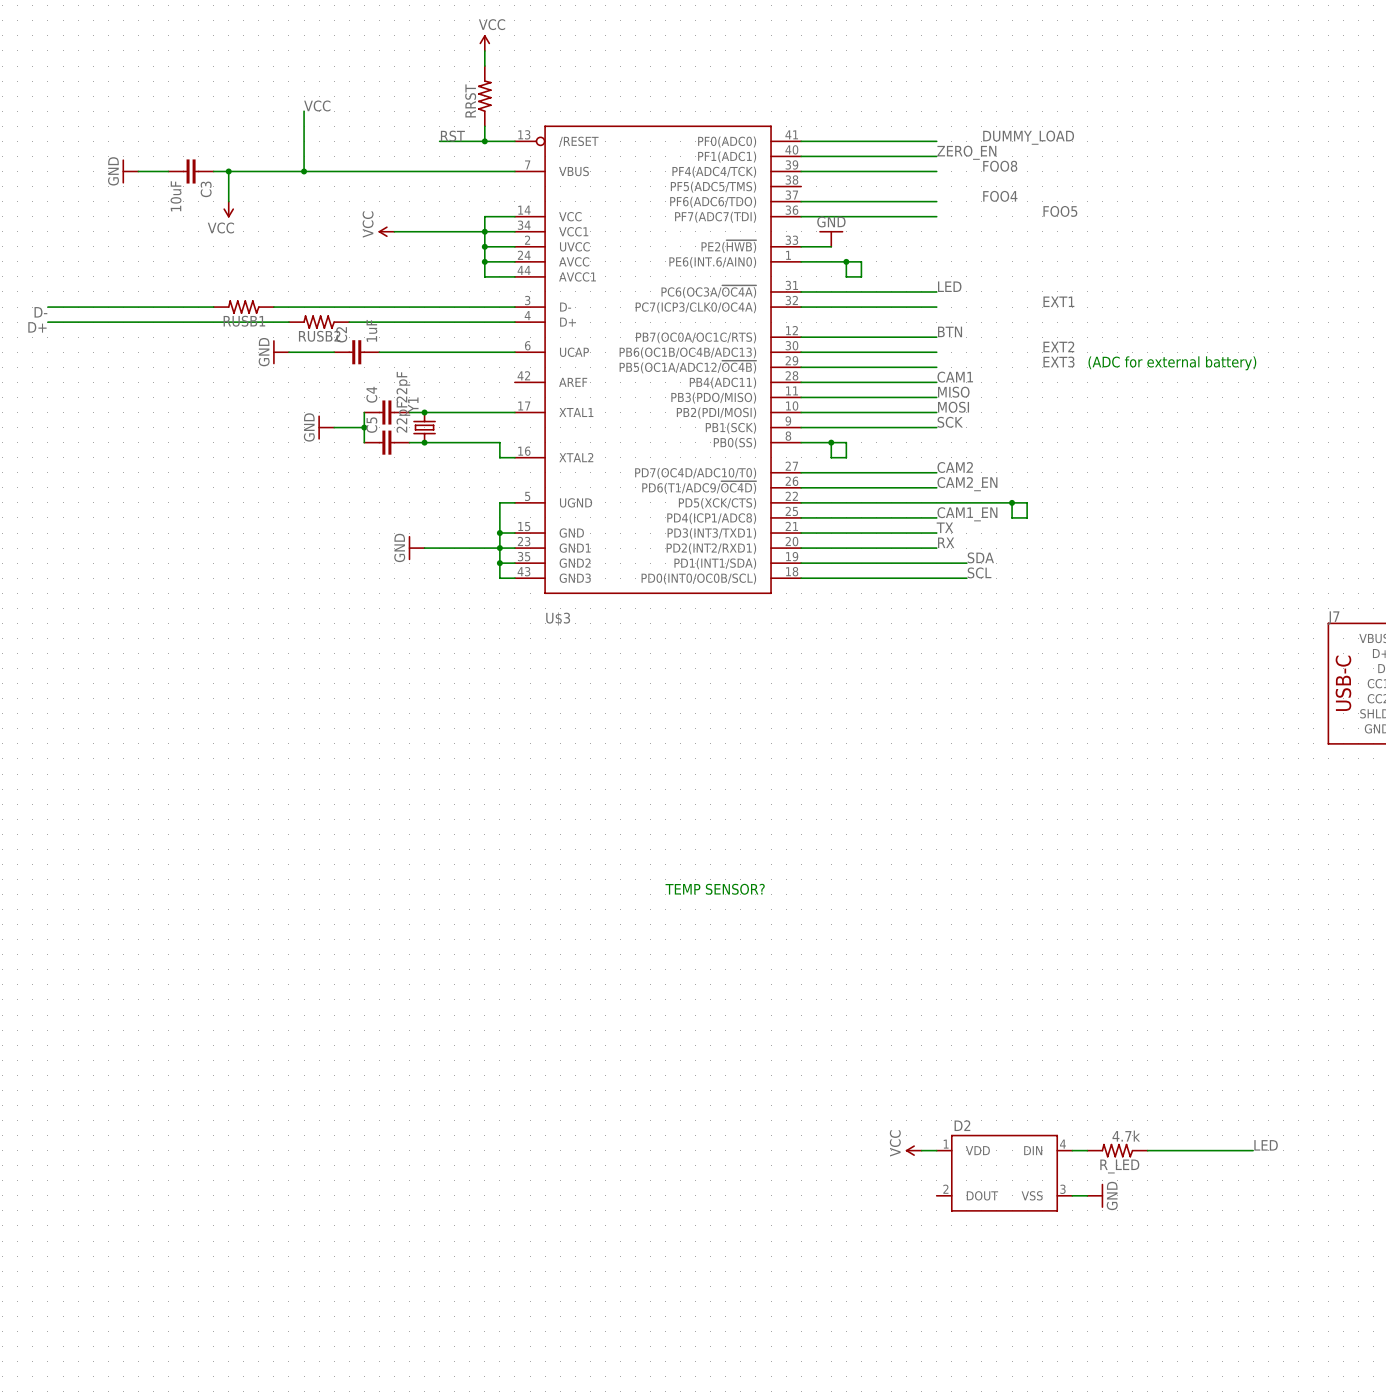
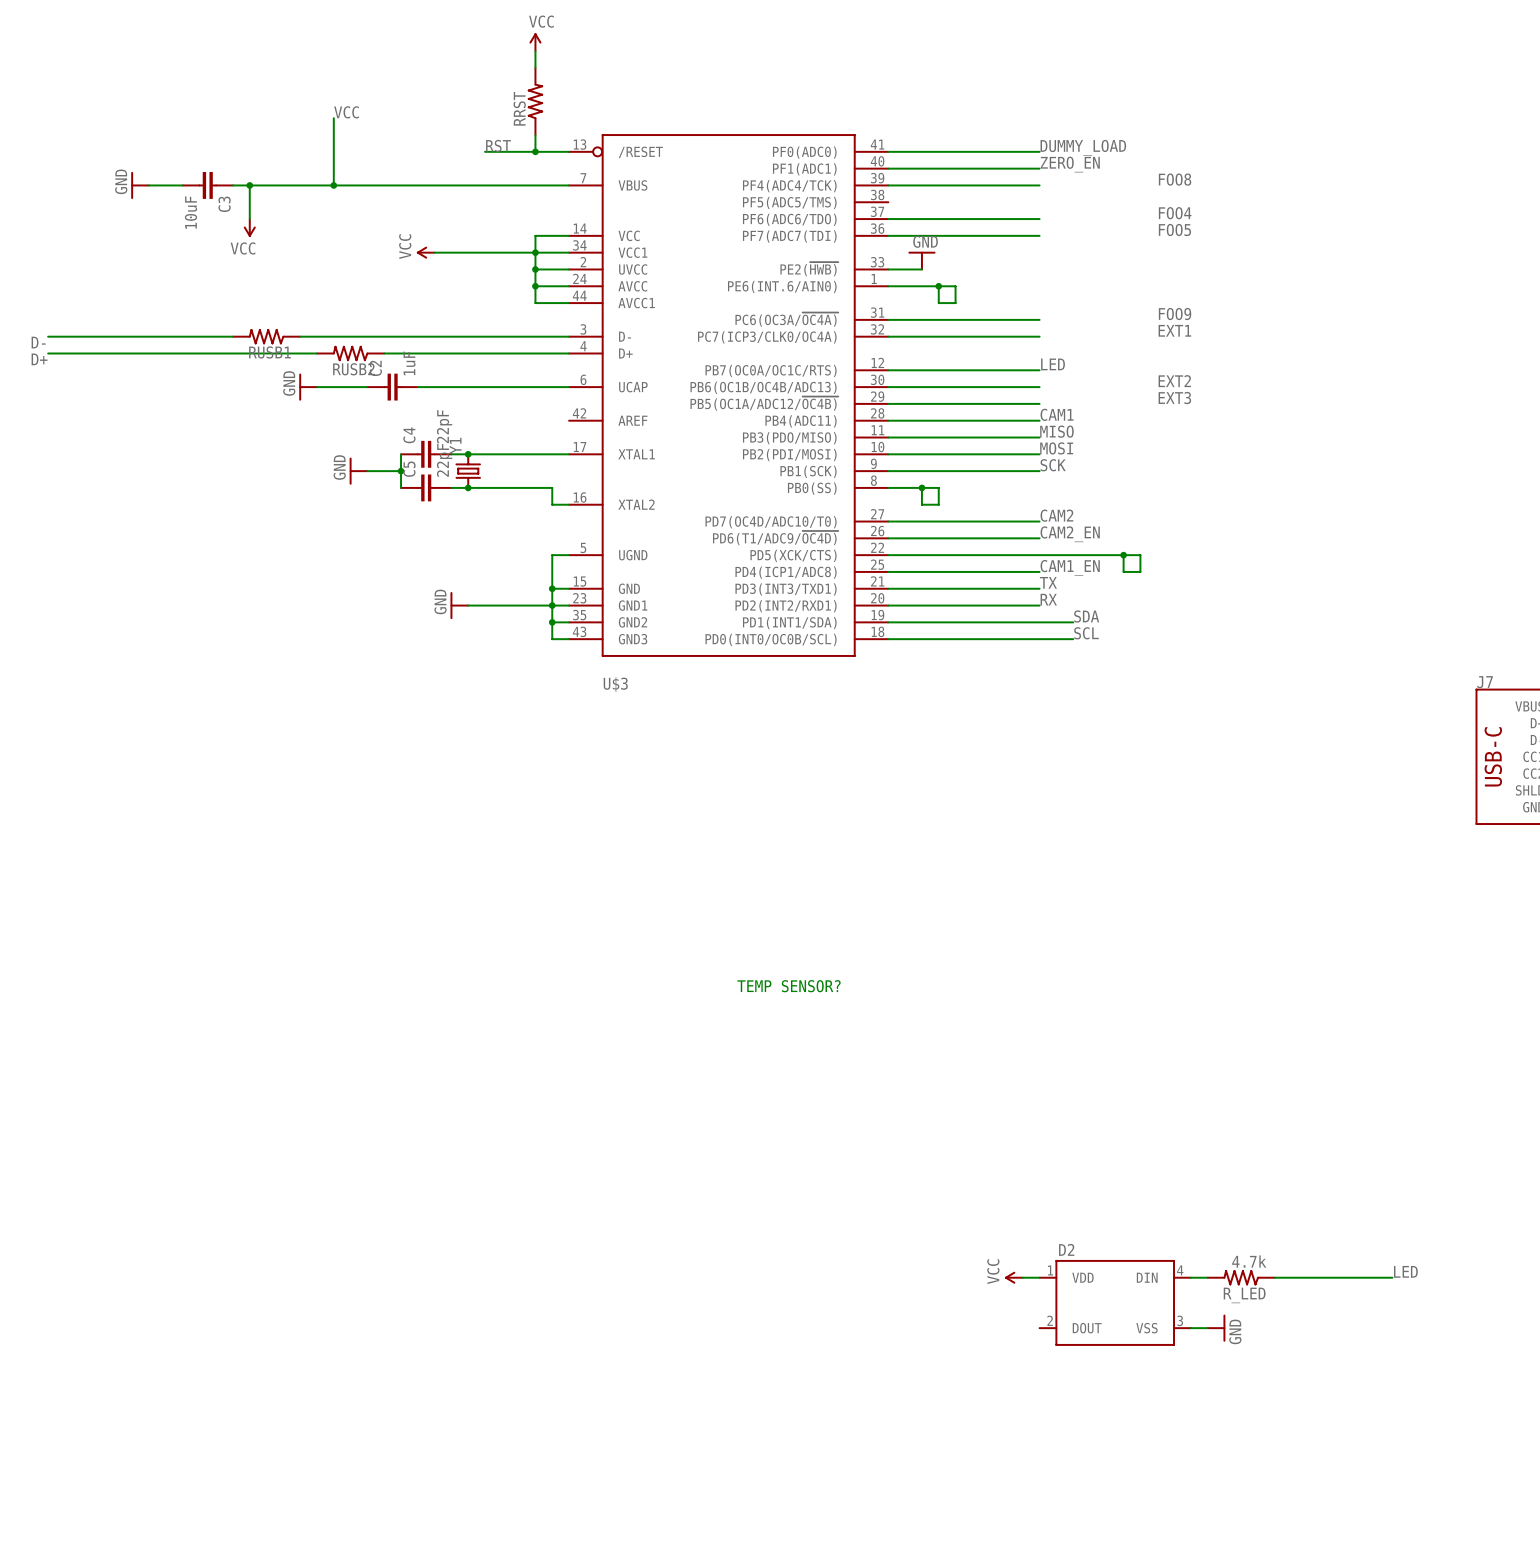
label position: DUMMY_LOAD (1028, 137) -> DUMMY_LOAD (1083, 147)
label position: FOO8 (1000, 166) -> FOO8 (1175, 179)
label position: FOO4 (1000, 196) -> FOO4 (1175, 213)
label: LED (949, 286) -> none
label: none -> FOO9 (1175, 314)
label: BTN (950, 331) -> LED (1053, 364)
text: (ADC for external battery) (1172, 363) -> none

